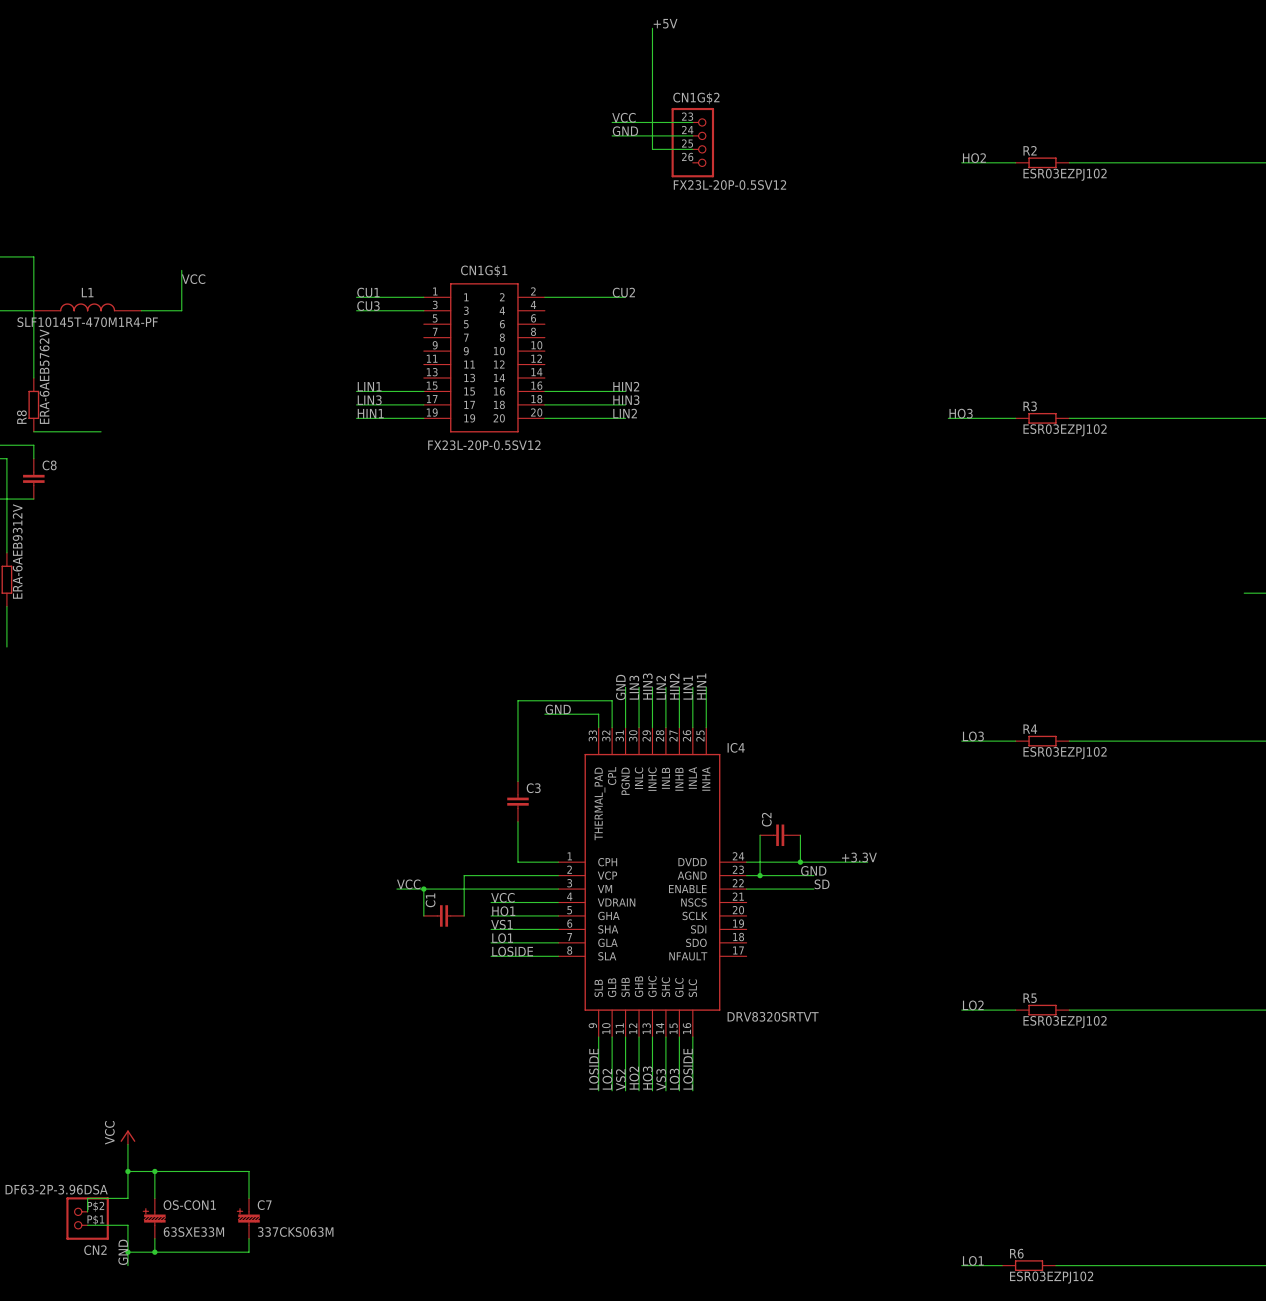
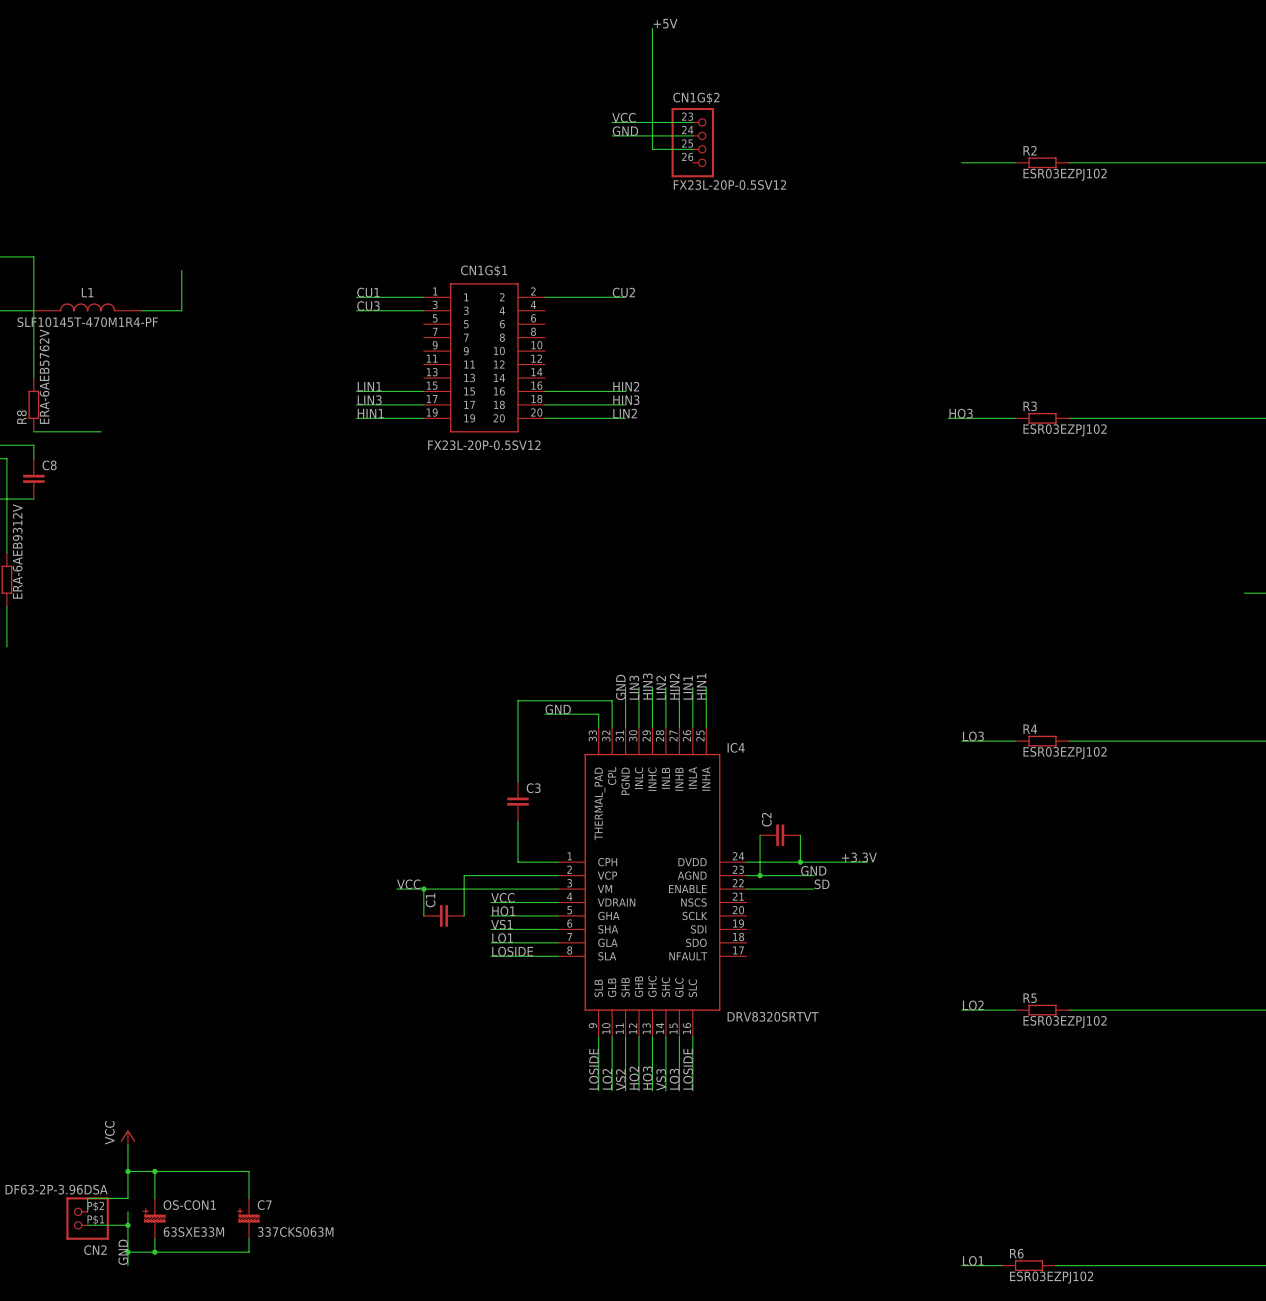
label: HO2 (974, 158) -> none
label: VCC (193, 279) -> none
wire: none -> (127, 1211) (127, 1225)
junction: none -> (127, 1225)

